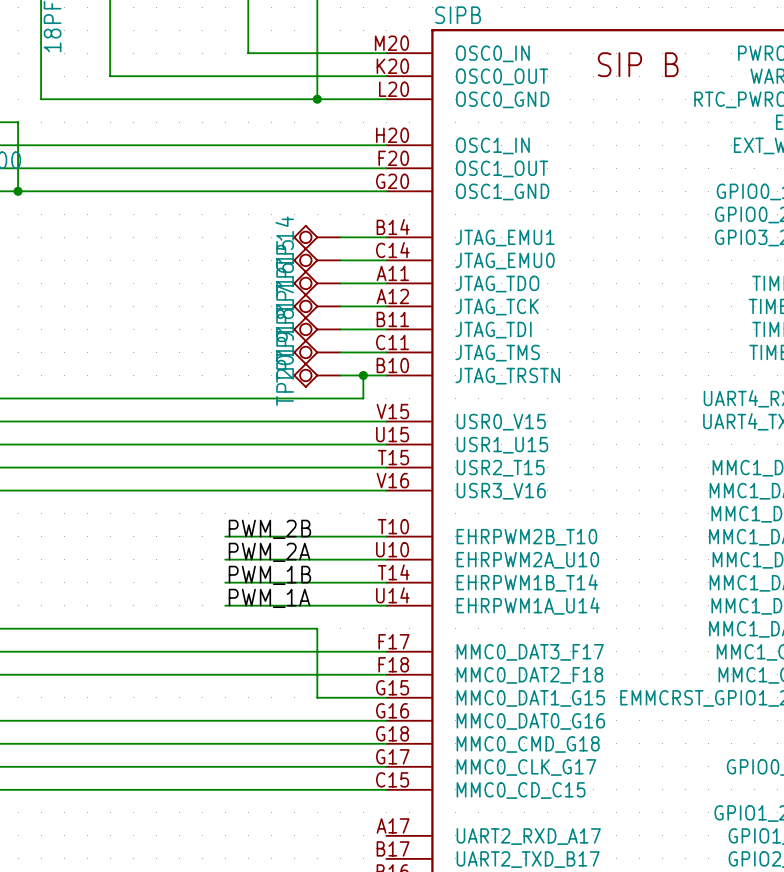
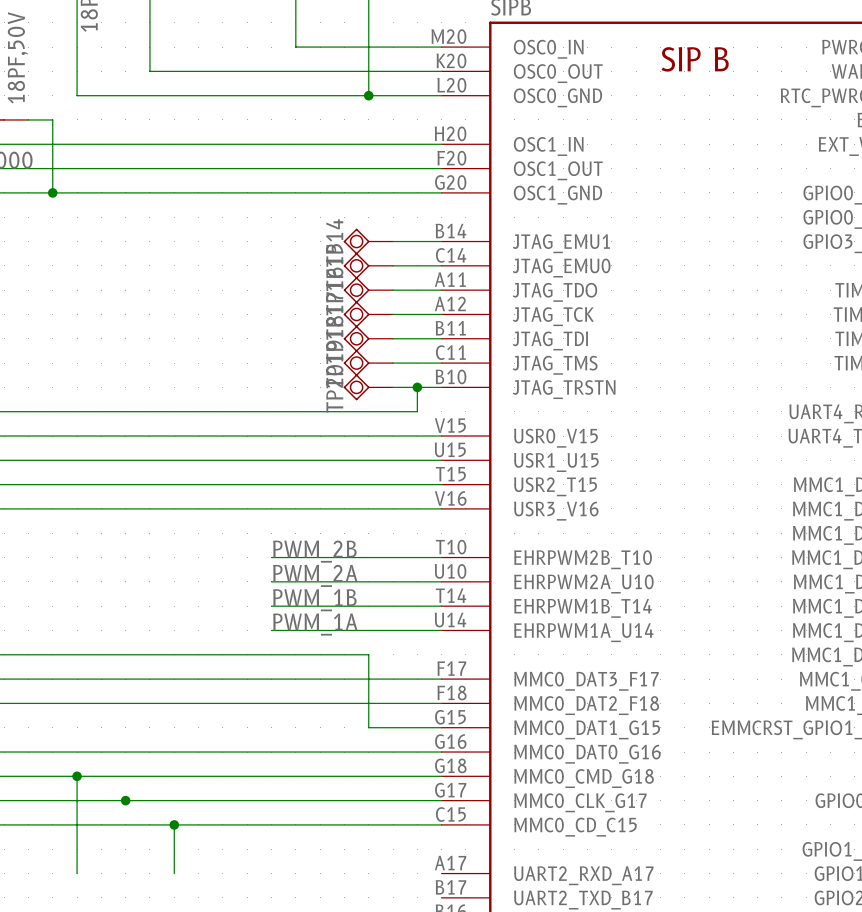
wire: none -> (77, 776) (77, 873)
junction: none -> (77, 776)
junction: none -> (125, 800)
wire: none -> (174, 824) (174, 873)
junction: none -> (174, 824)

